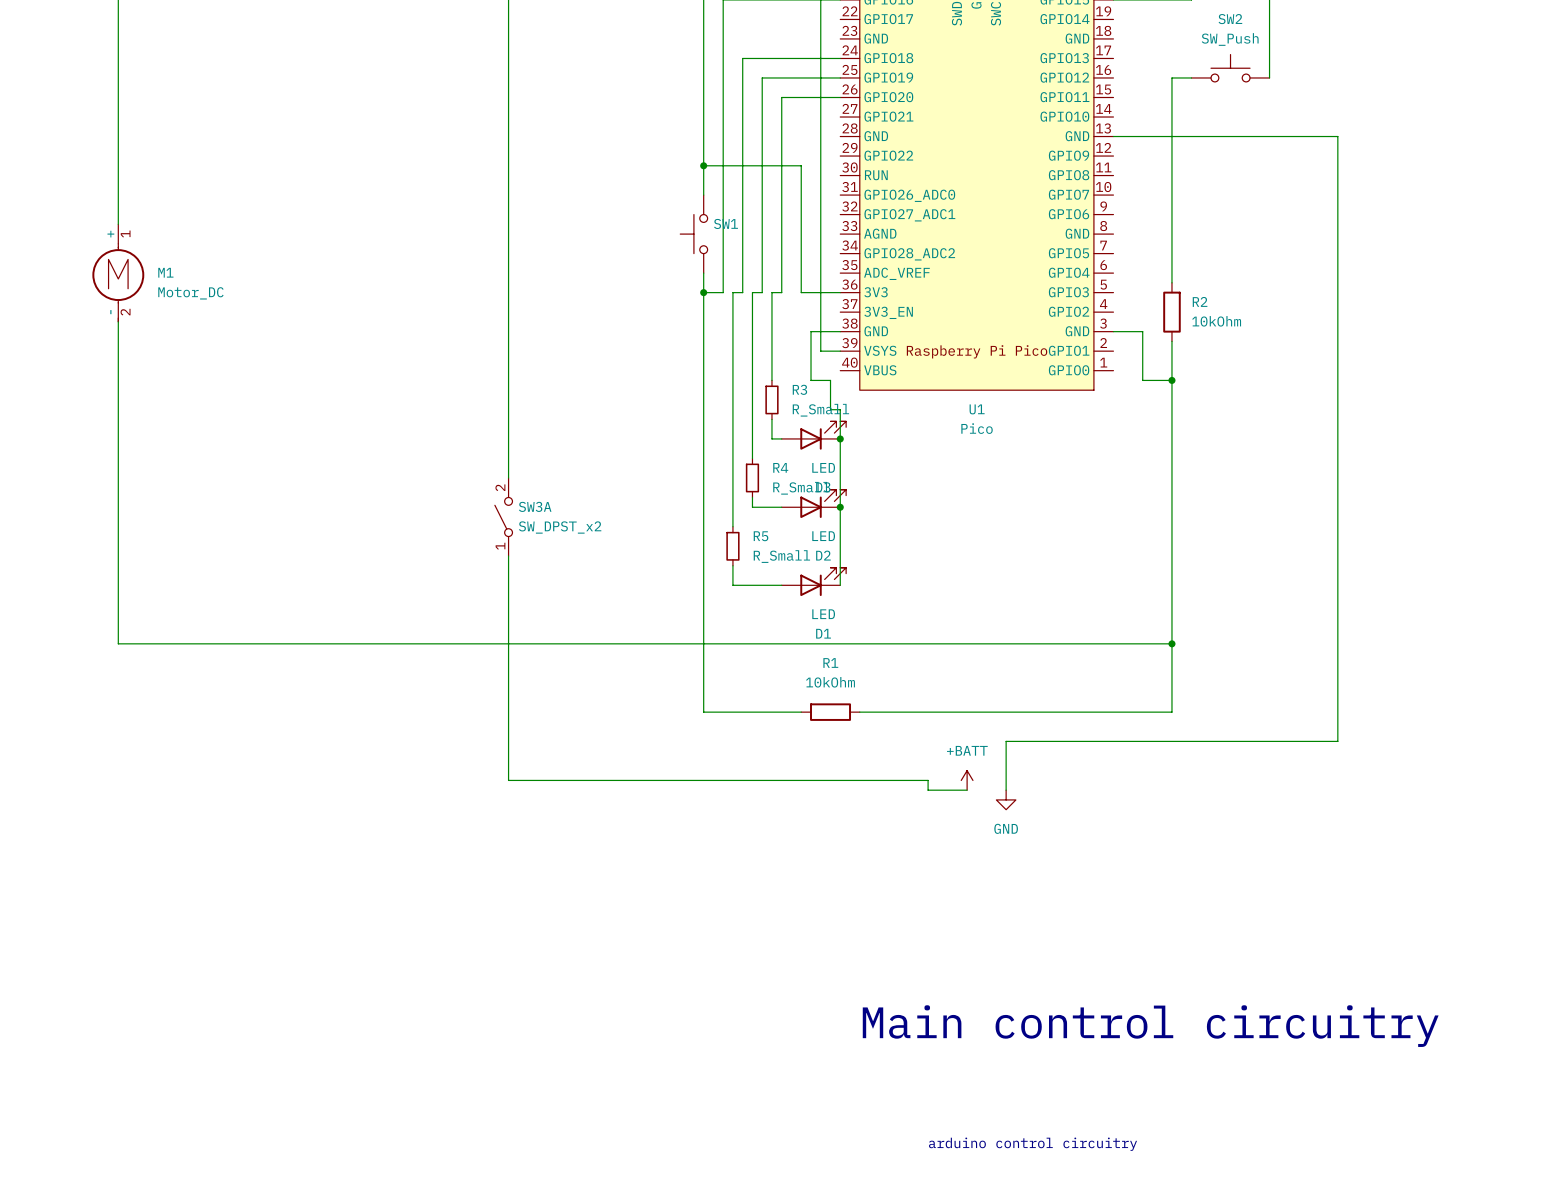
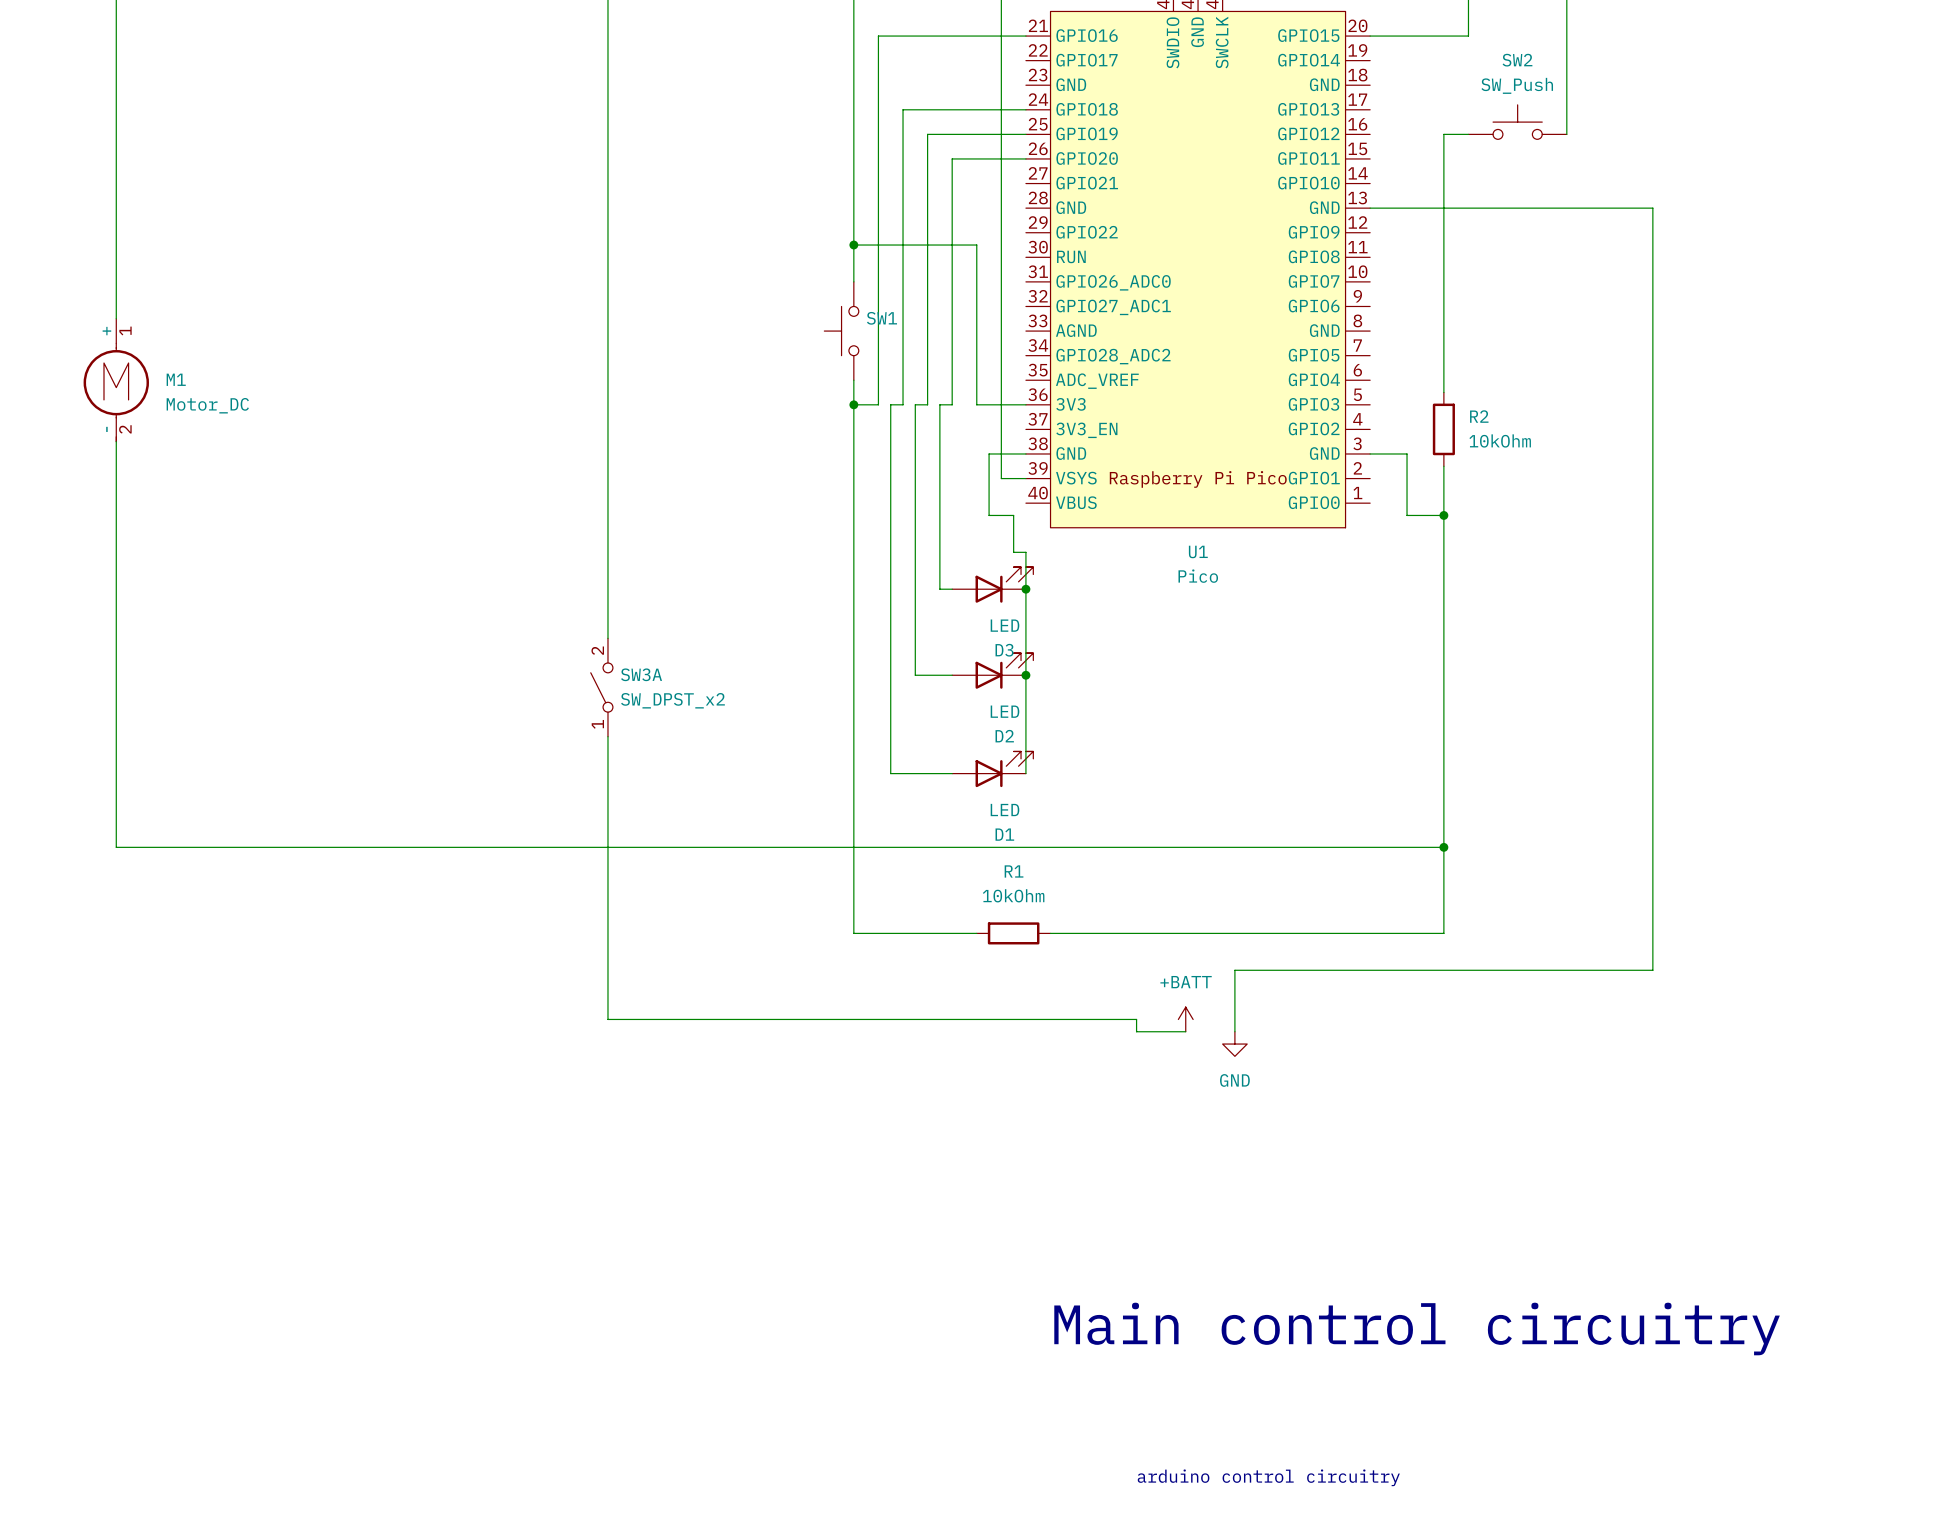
wire: none -> (939, 515) (939, 564)
R3: R_Small (771, 399) -> none
wire: none -> (915, 613) (915, 662)
R4: R_Small (752, 477) -> none
wire: none -> (890, 699) (890, 749)
R5: R_Small (732, 546) -> none

